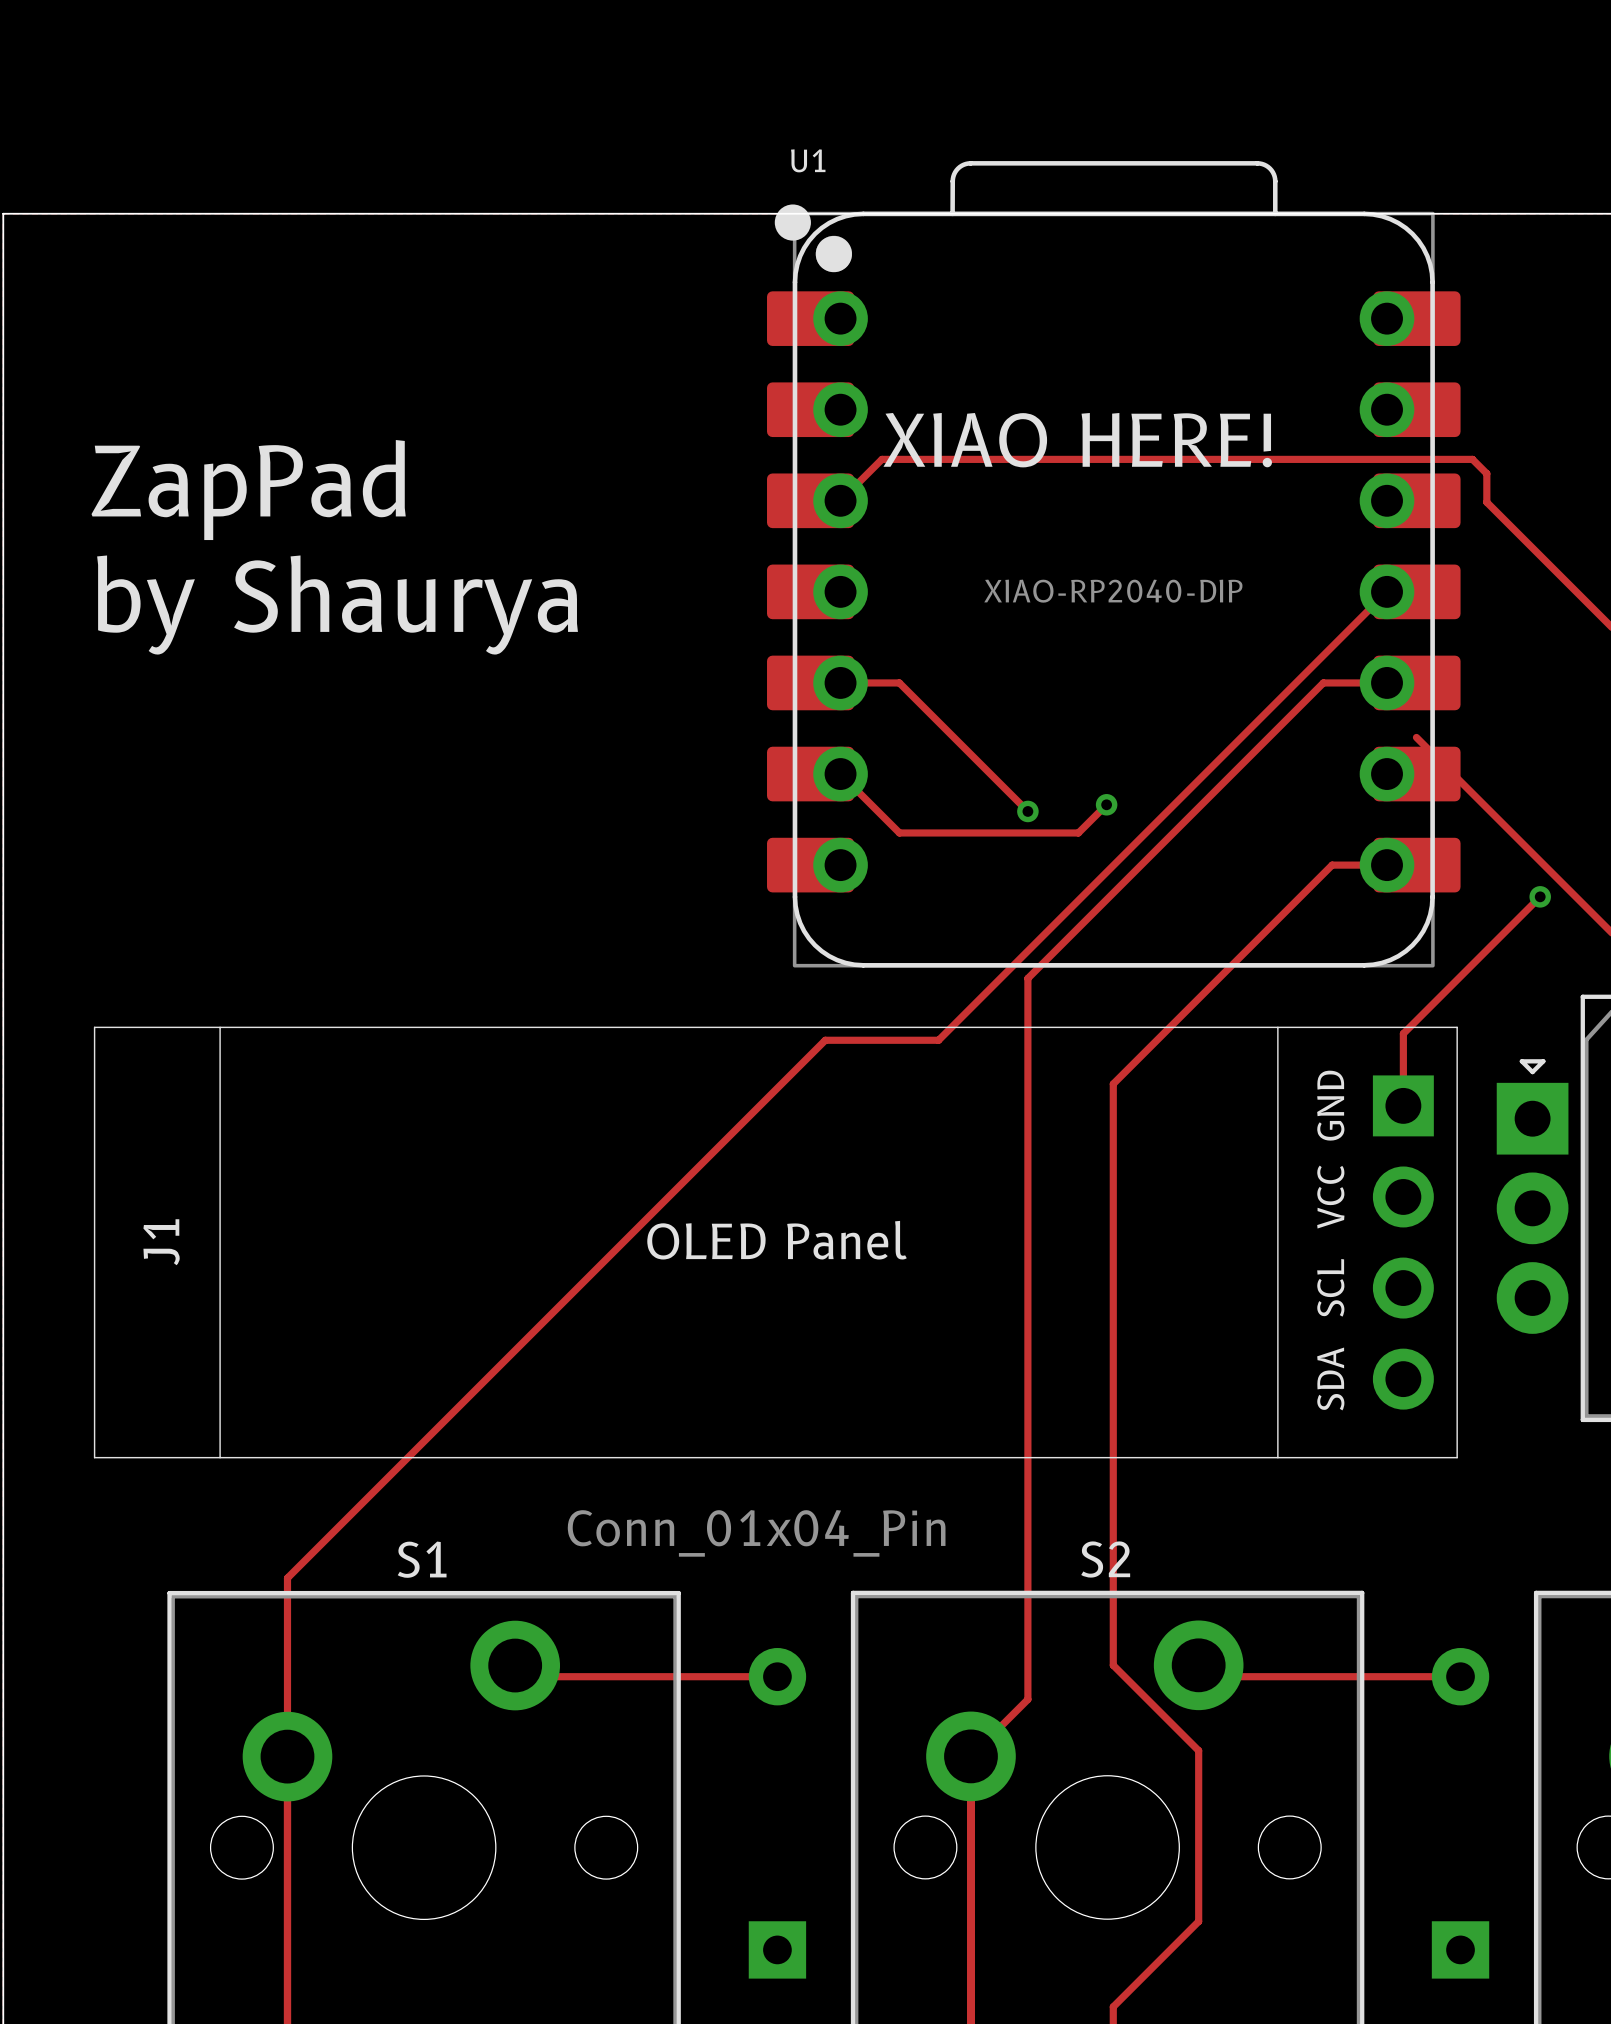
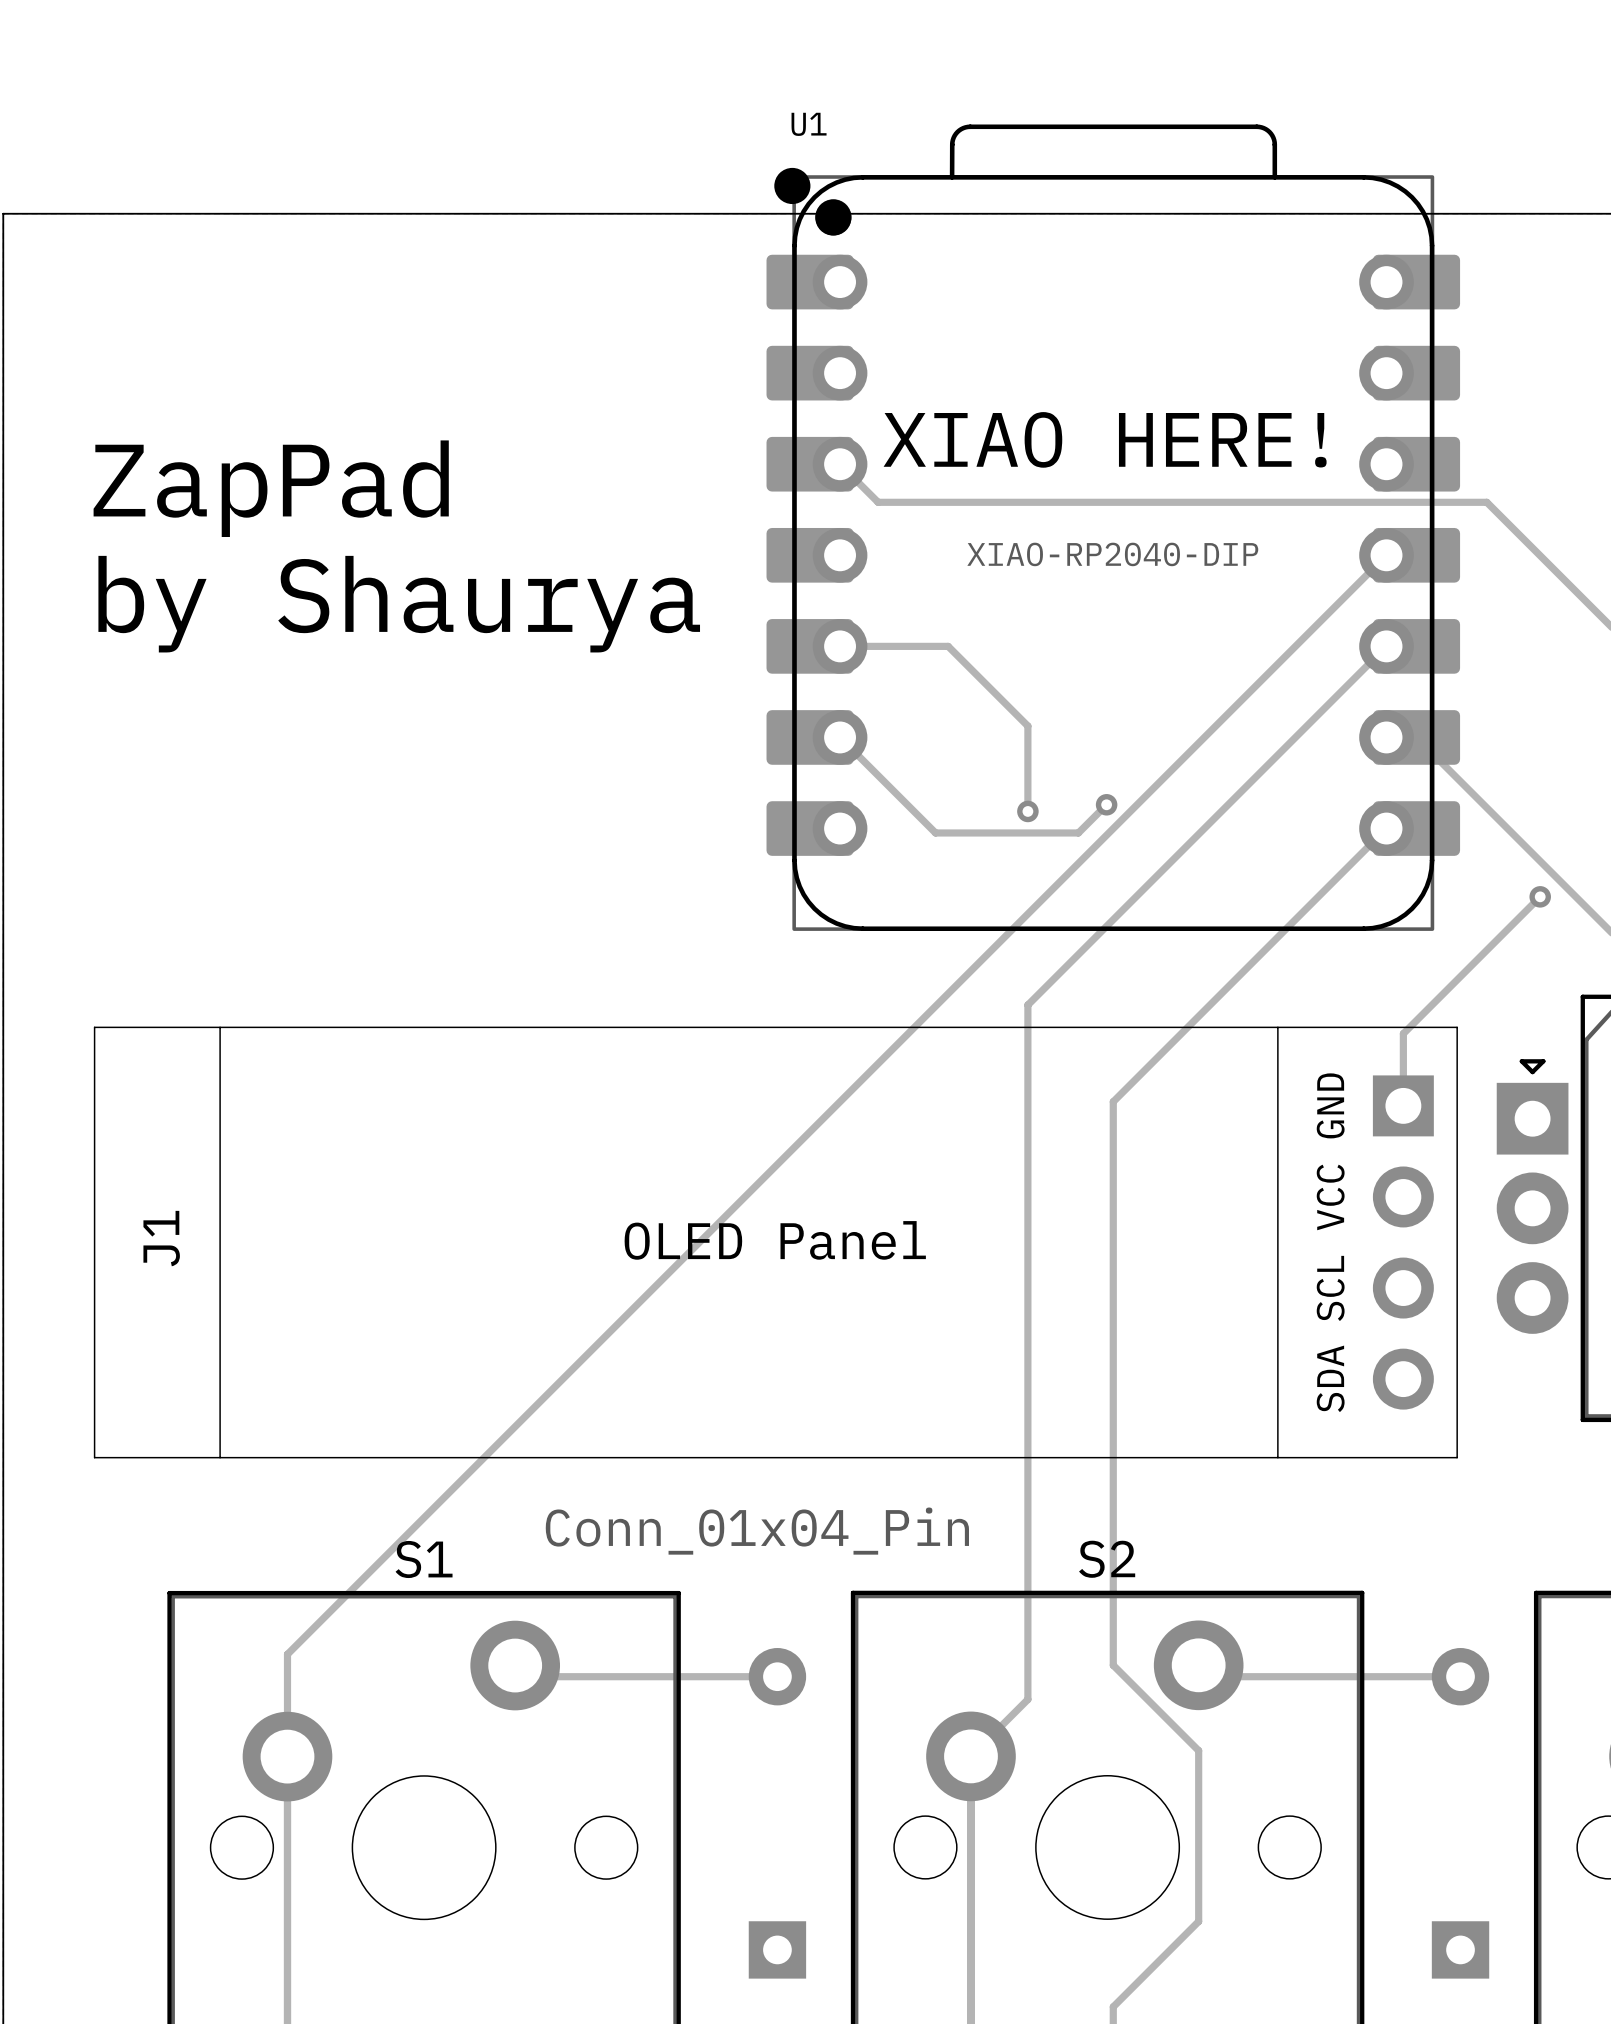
track: (840, 500) (881, 459) (1472, 459) (1486, 473) (1486, 502) -> (840, 464) (878, 502) (1486, 502)
U1 position: (1113, 564) -> (1113, 527)
track: (1387, 591) (938, 1040) (825, 1040) (287, 1578) (287, 1654) -> (1386, 555) (287, 1654)
track: (840, 682) (899, 682) (1027, 811) -> (840, 646) (948, 646) (1027, 726) (1027, 811)
track: (1387, 682) (1323, 682) (1027, 978) (1027, 1005) -> (1386, 646) (1027, 1005)
track: (840, 774) (899, 832) (935, 832) -> (840, 737) (935, 832)
track: (1387, 865) (1332, 865) (1113, 1083) (1113, 1101) -> (1386, 828) (1113, 1101)

